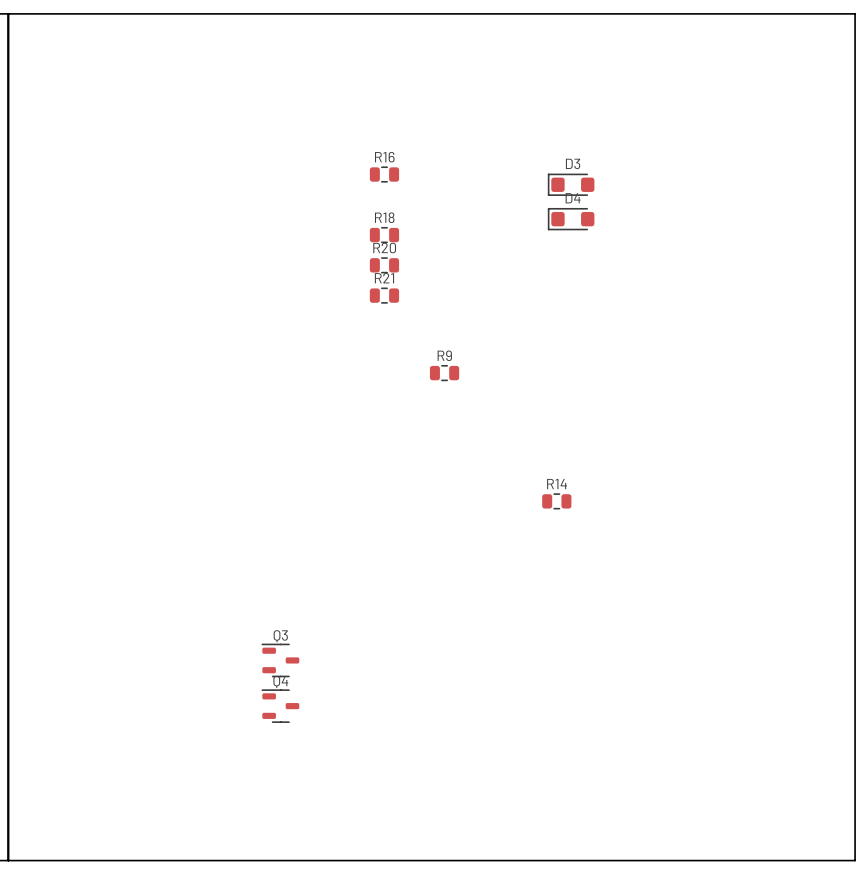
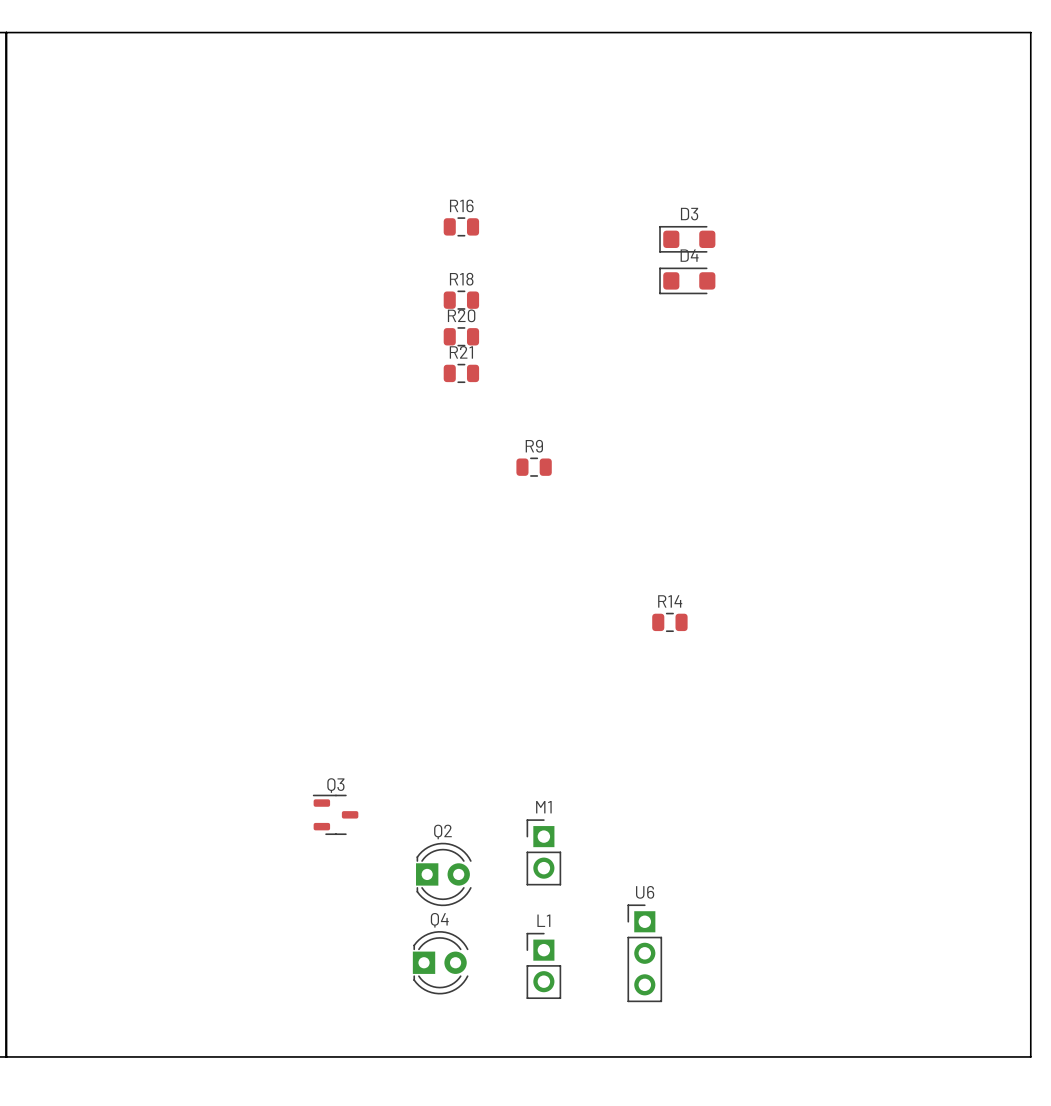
Q4 footprint: [261, 689, 300, 723] -> [412, 931, 469, 995]
M1: none -> (543, 852)
Q2: none -> (443, 874)
U6: none -> (644, 953)
L1: none -> (543, 965)

